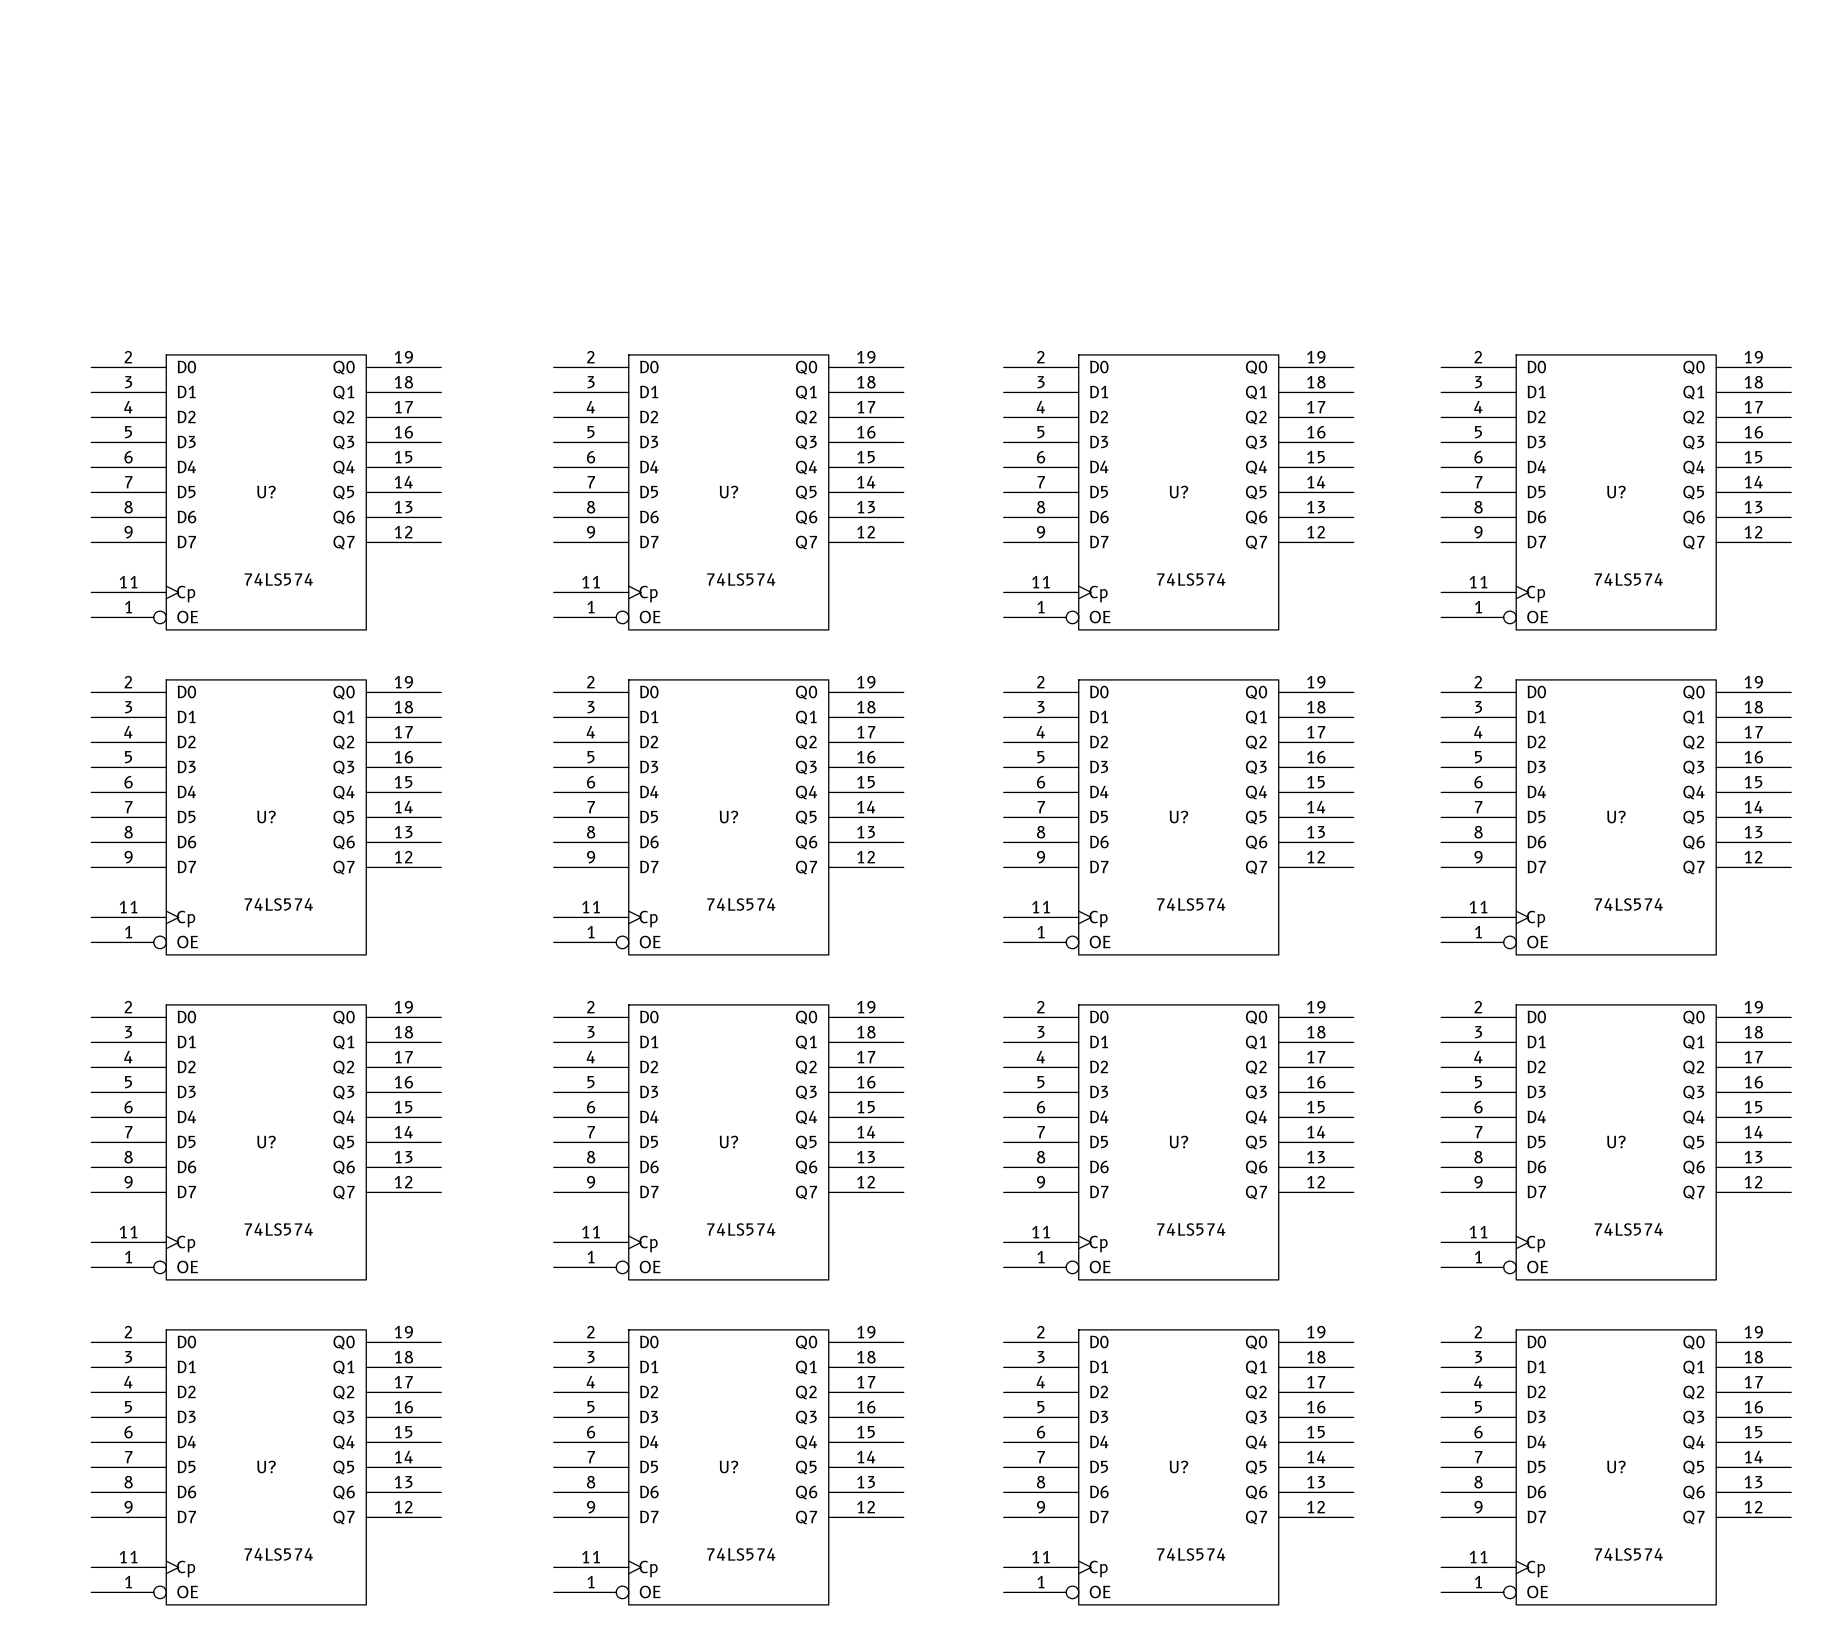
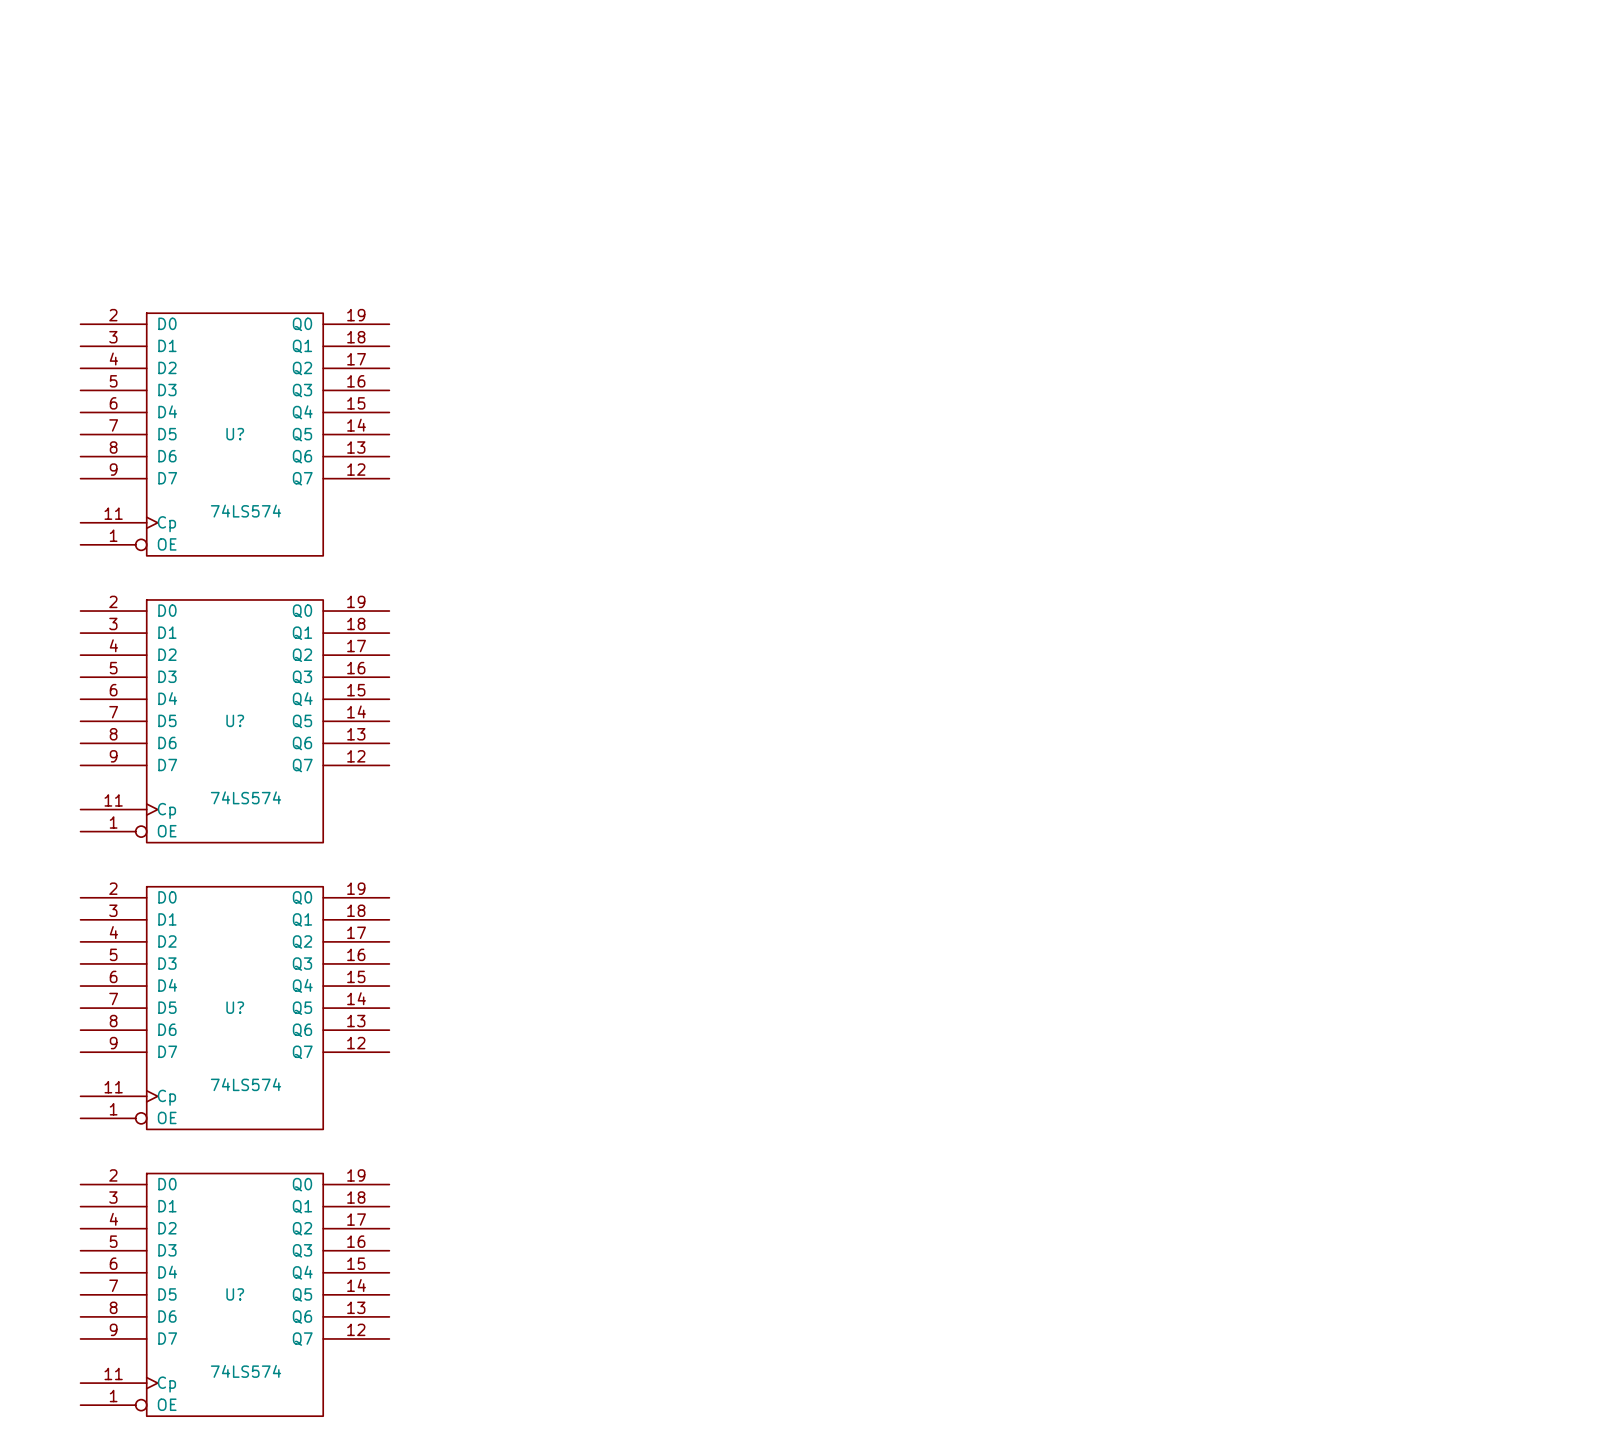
U?: 74LS574 (728, 492) -> none
U?: 74LS574 (1178, 492) -> none
U?: 74LS574 (1616, 492) -> none
U?: 74LS574 (728, 817) -> none
U?: 74LS574 (1178, 817) -> none
U?: 74LS574 (1616, 817) -> none
U?: 74LS574 (728, 1142) -> none
U?: 74LS574 (1178, 1142) -> none
U?: 74LS574 (1616, 1142) -> none
U?: 74LS574 (728, 1467) -> none
U?: 74LS574 (1178, 1467) -> none
U?: 74LS574 (1616, 1467) -> none

